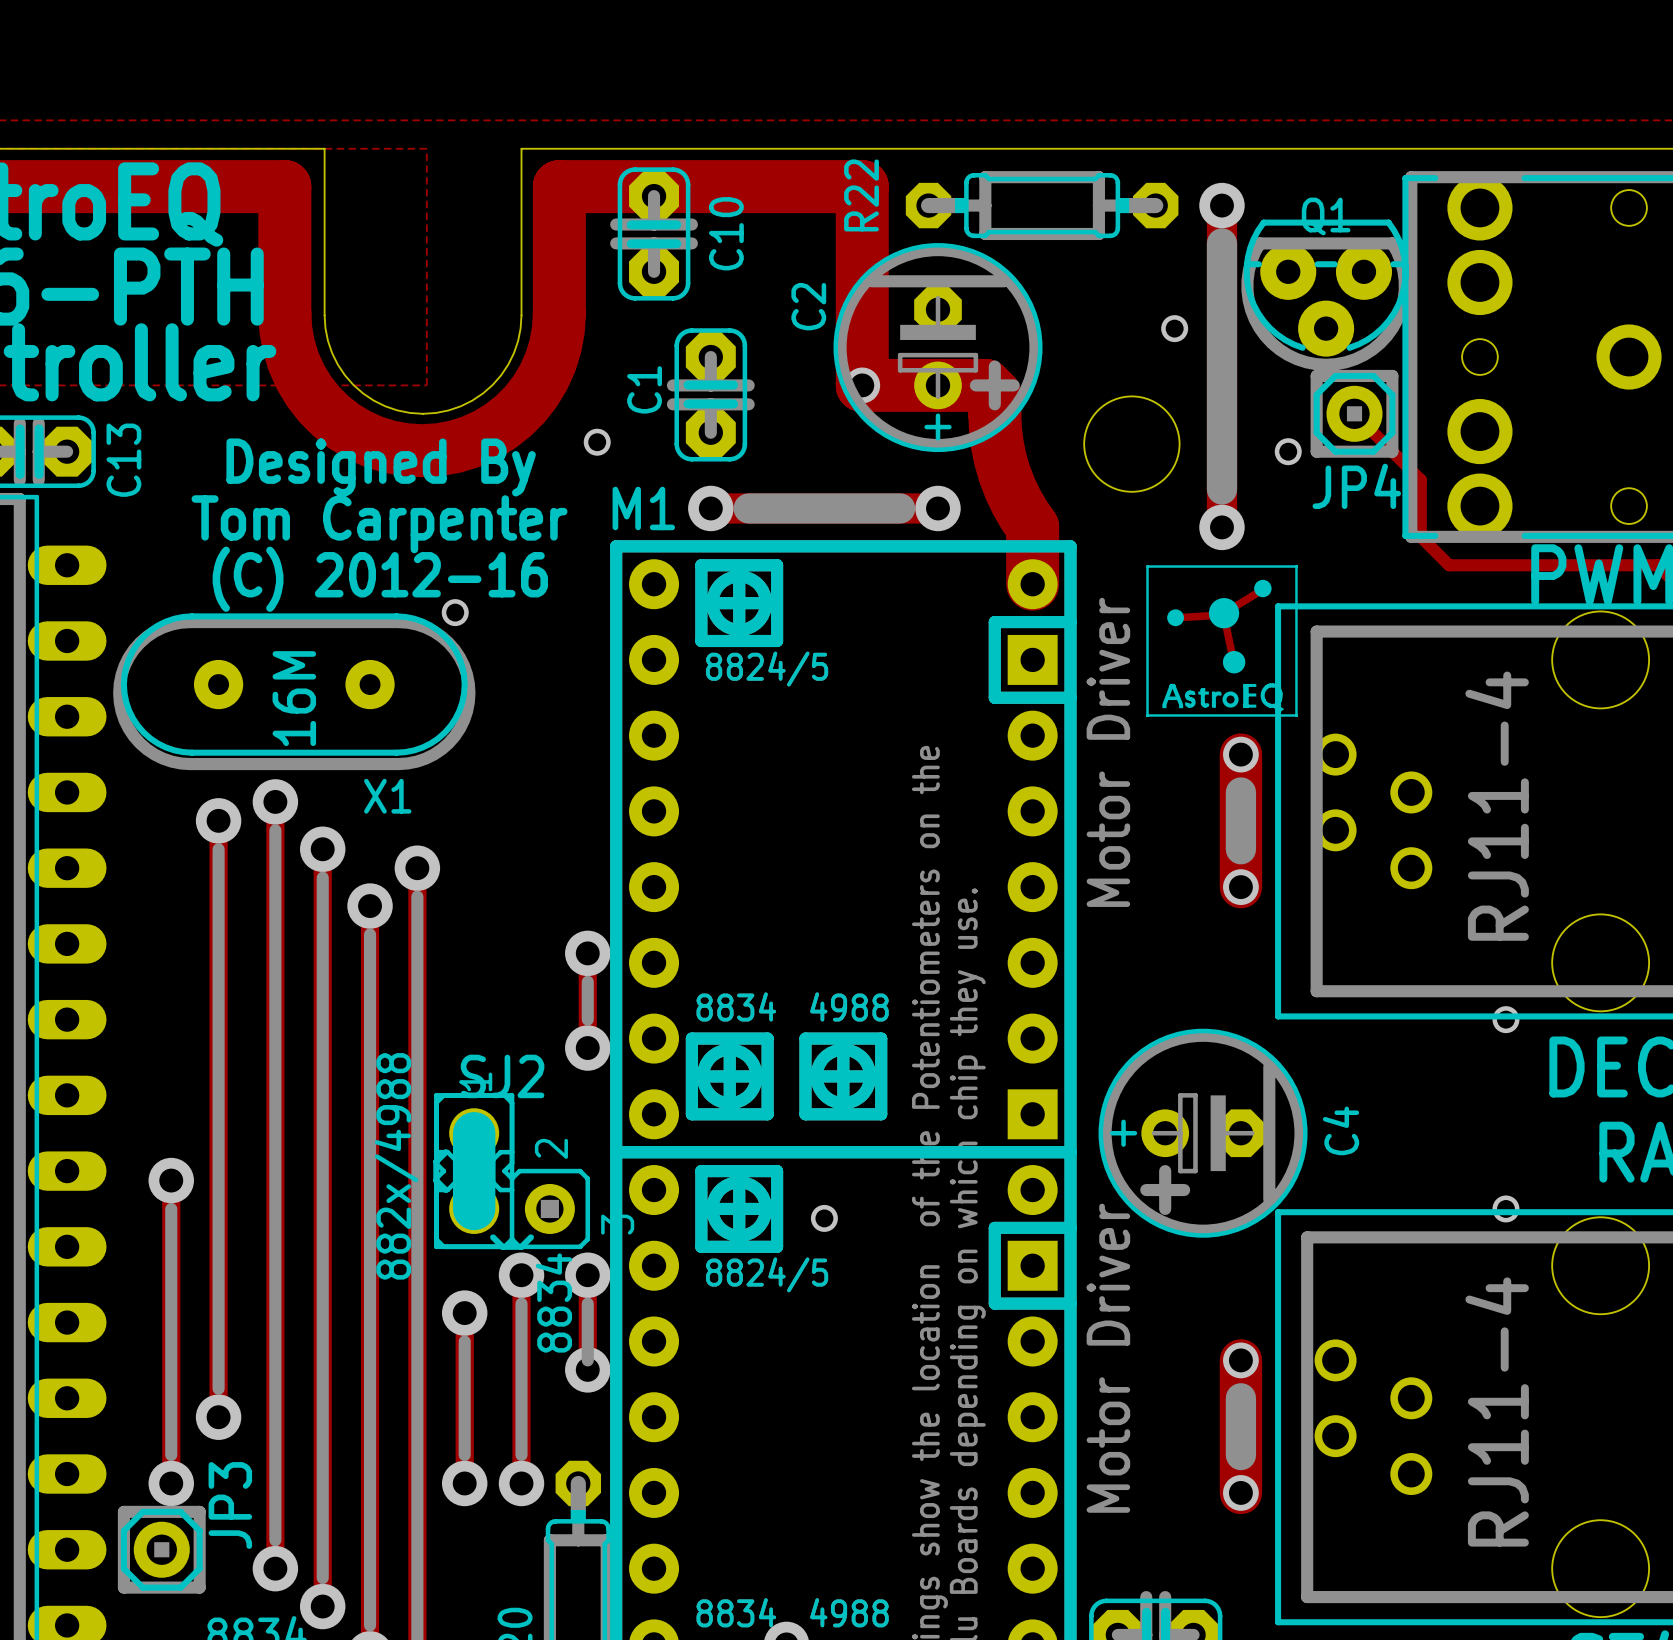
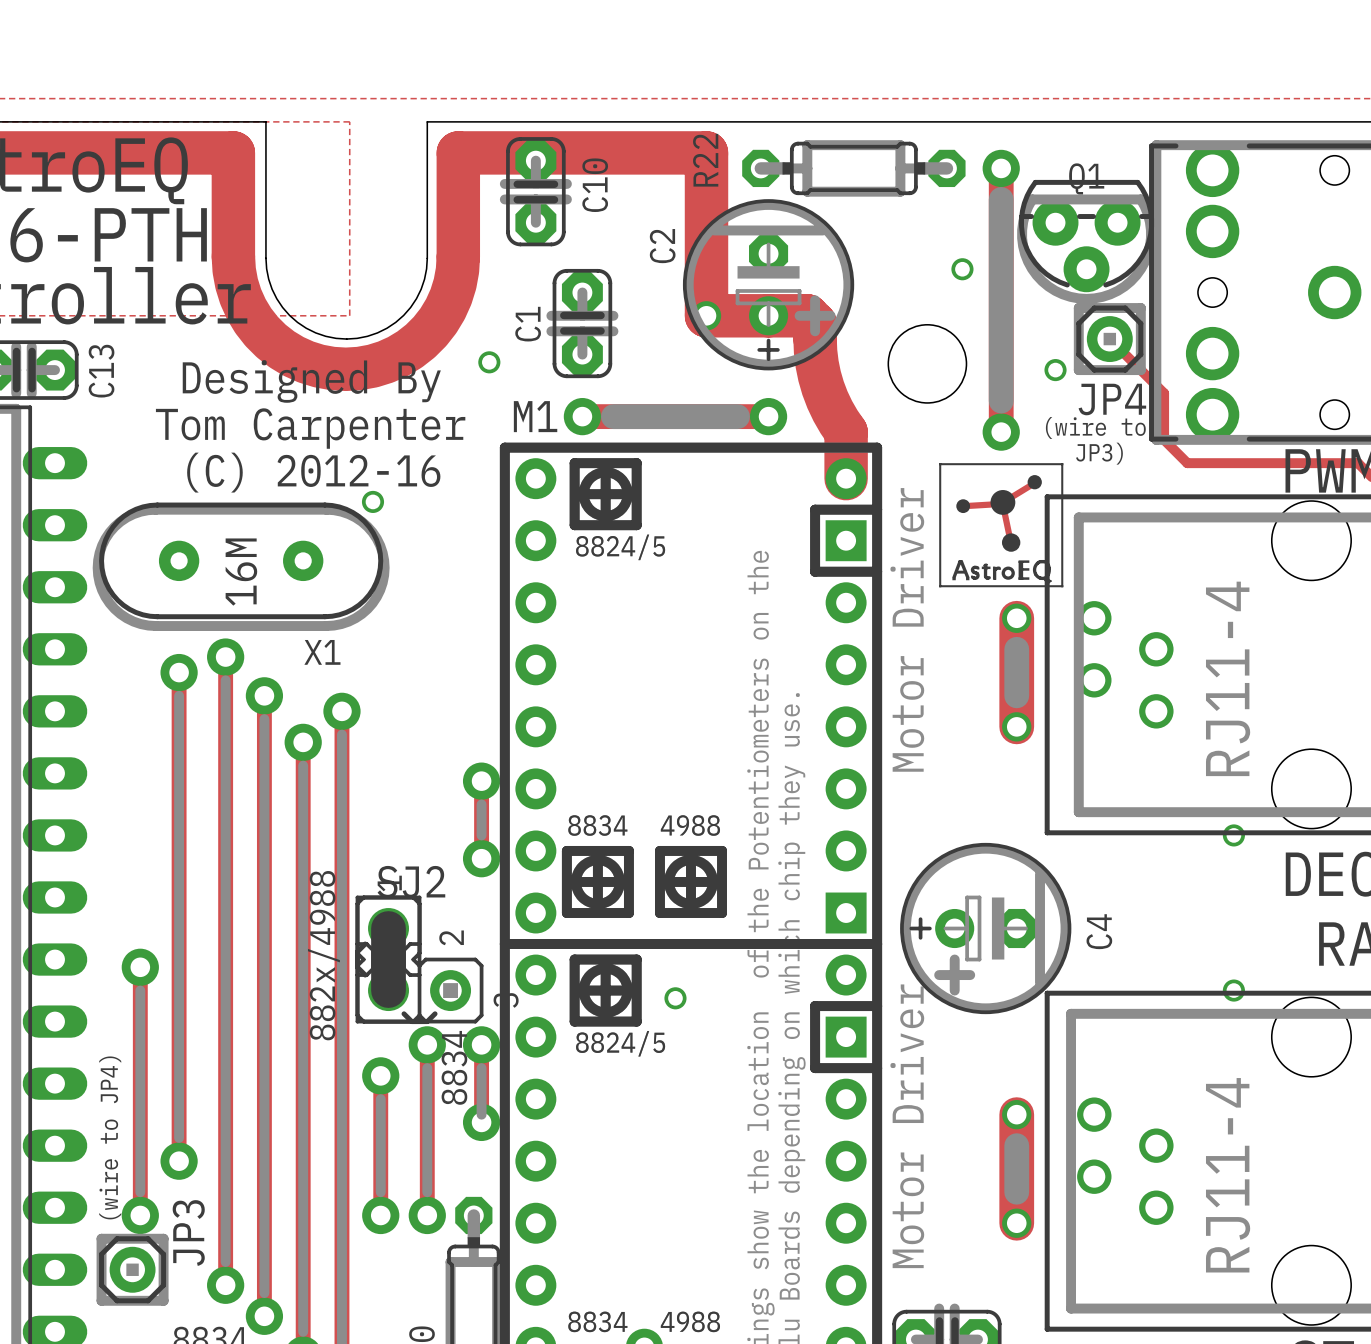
text: none -> (wire to (1095, 427)
text: none -> JP3) (1099, 453)
text: none -> (wire to JP4) (110, 1137)

